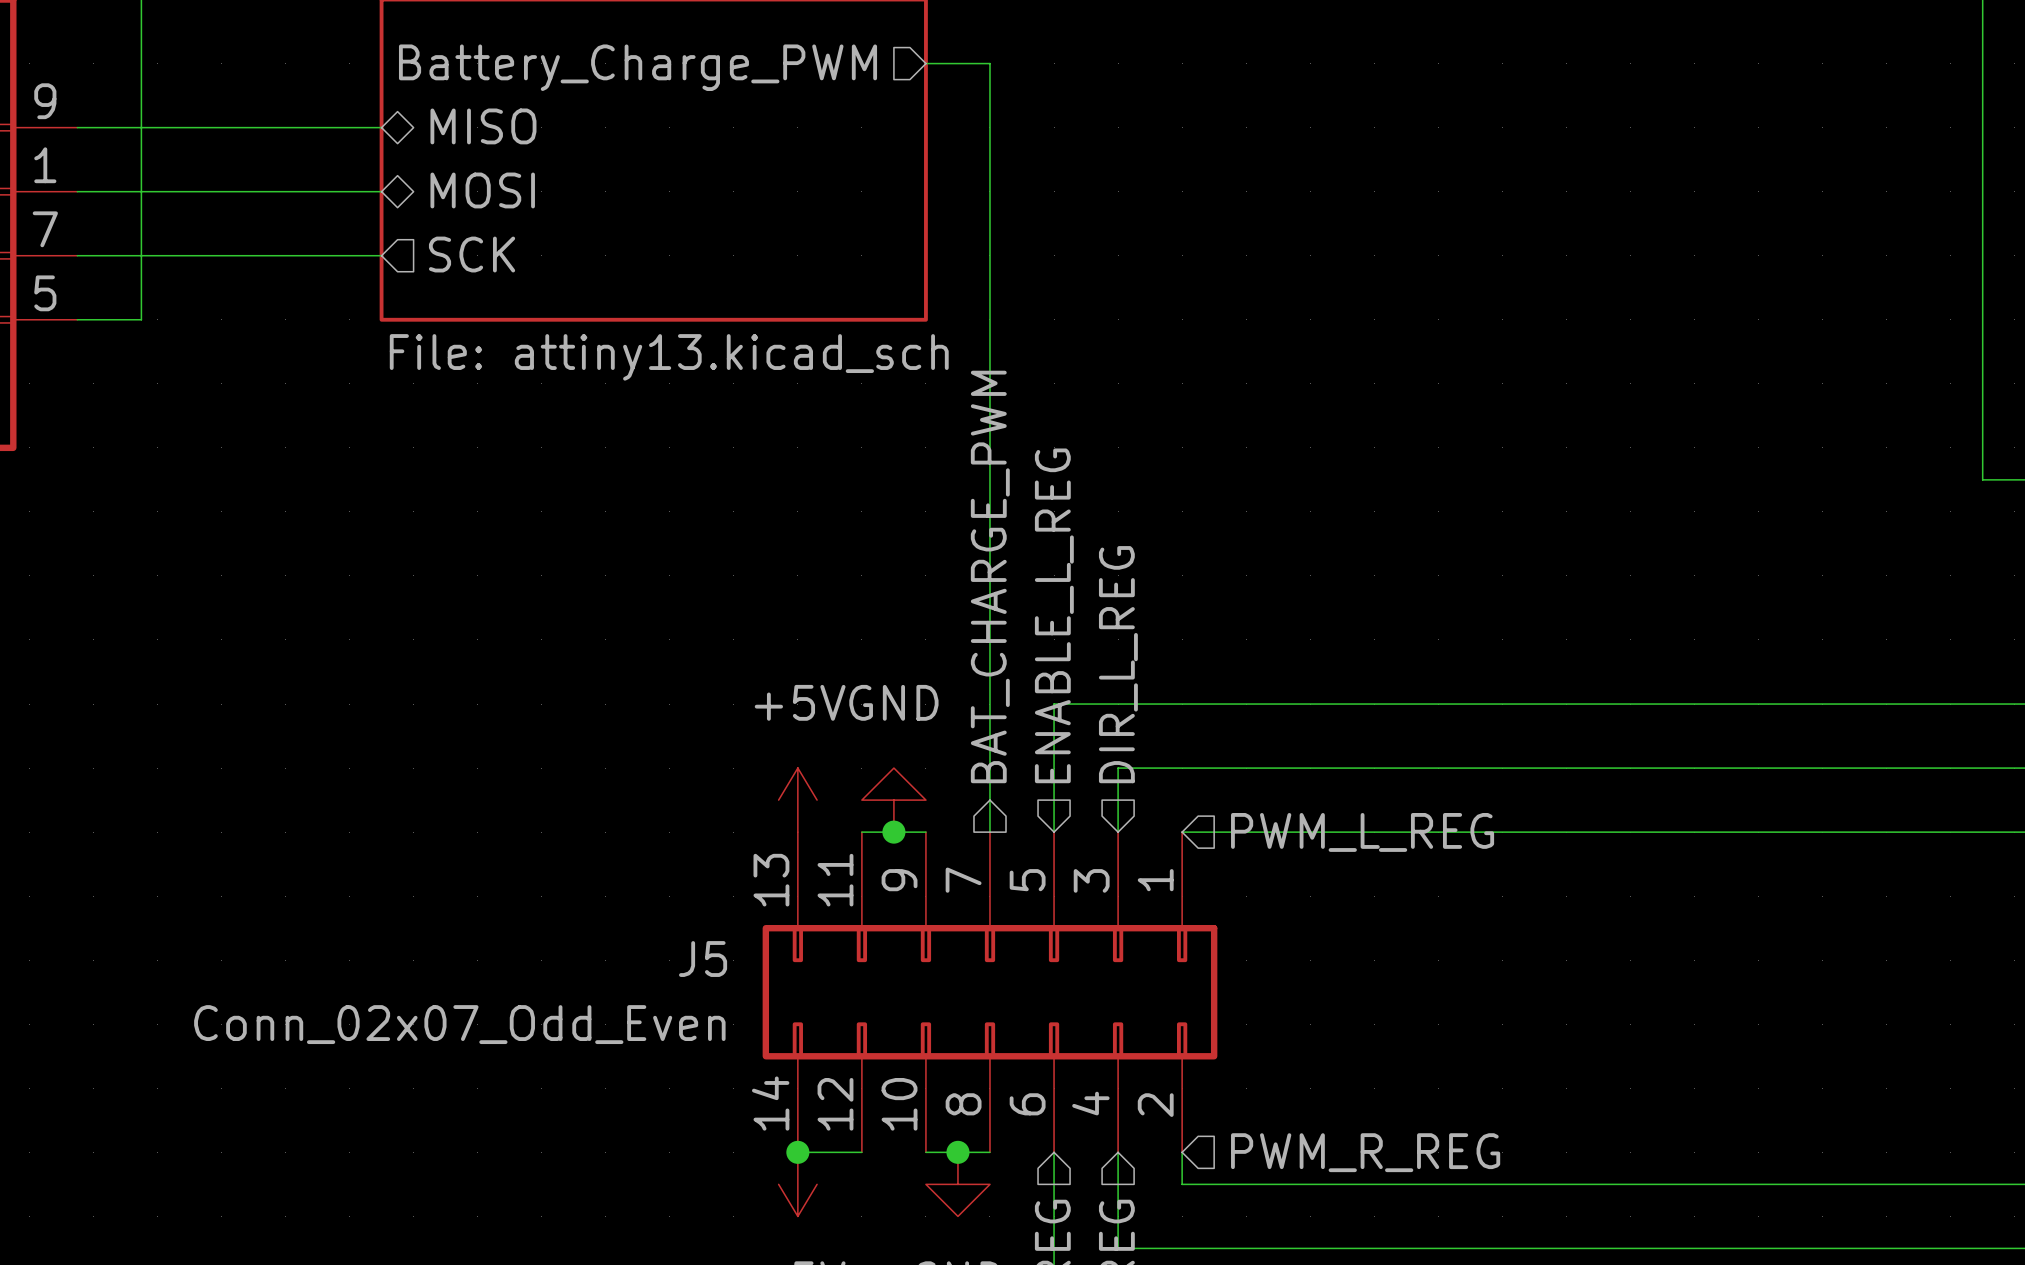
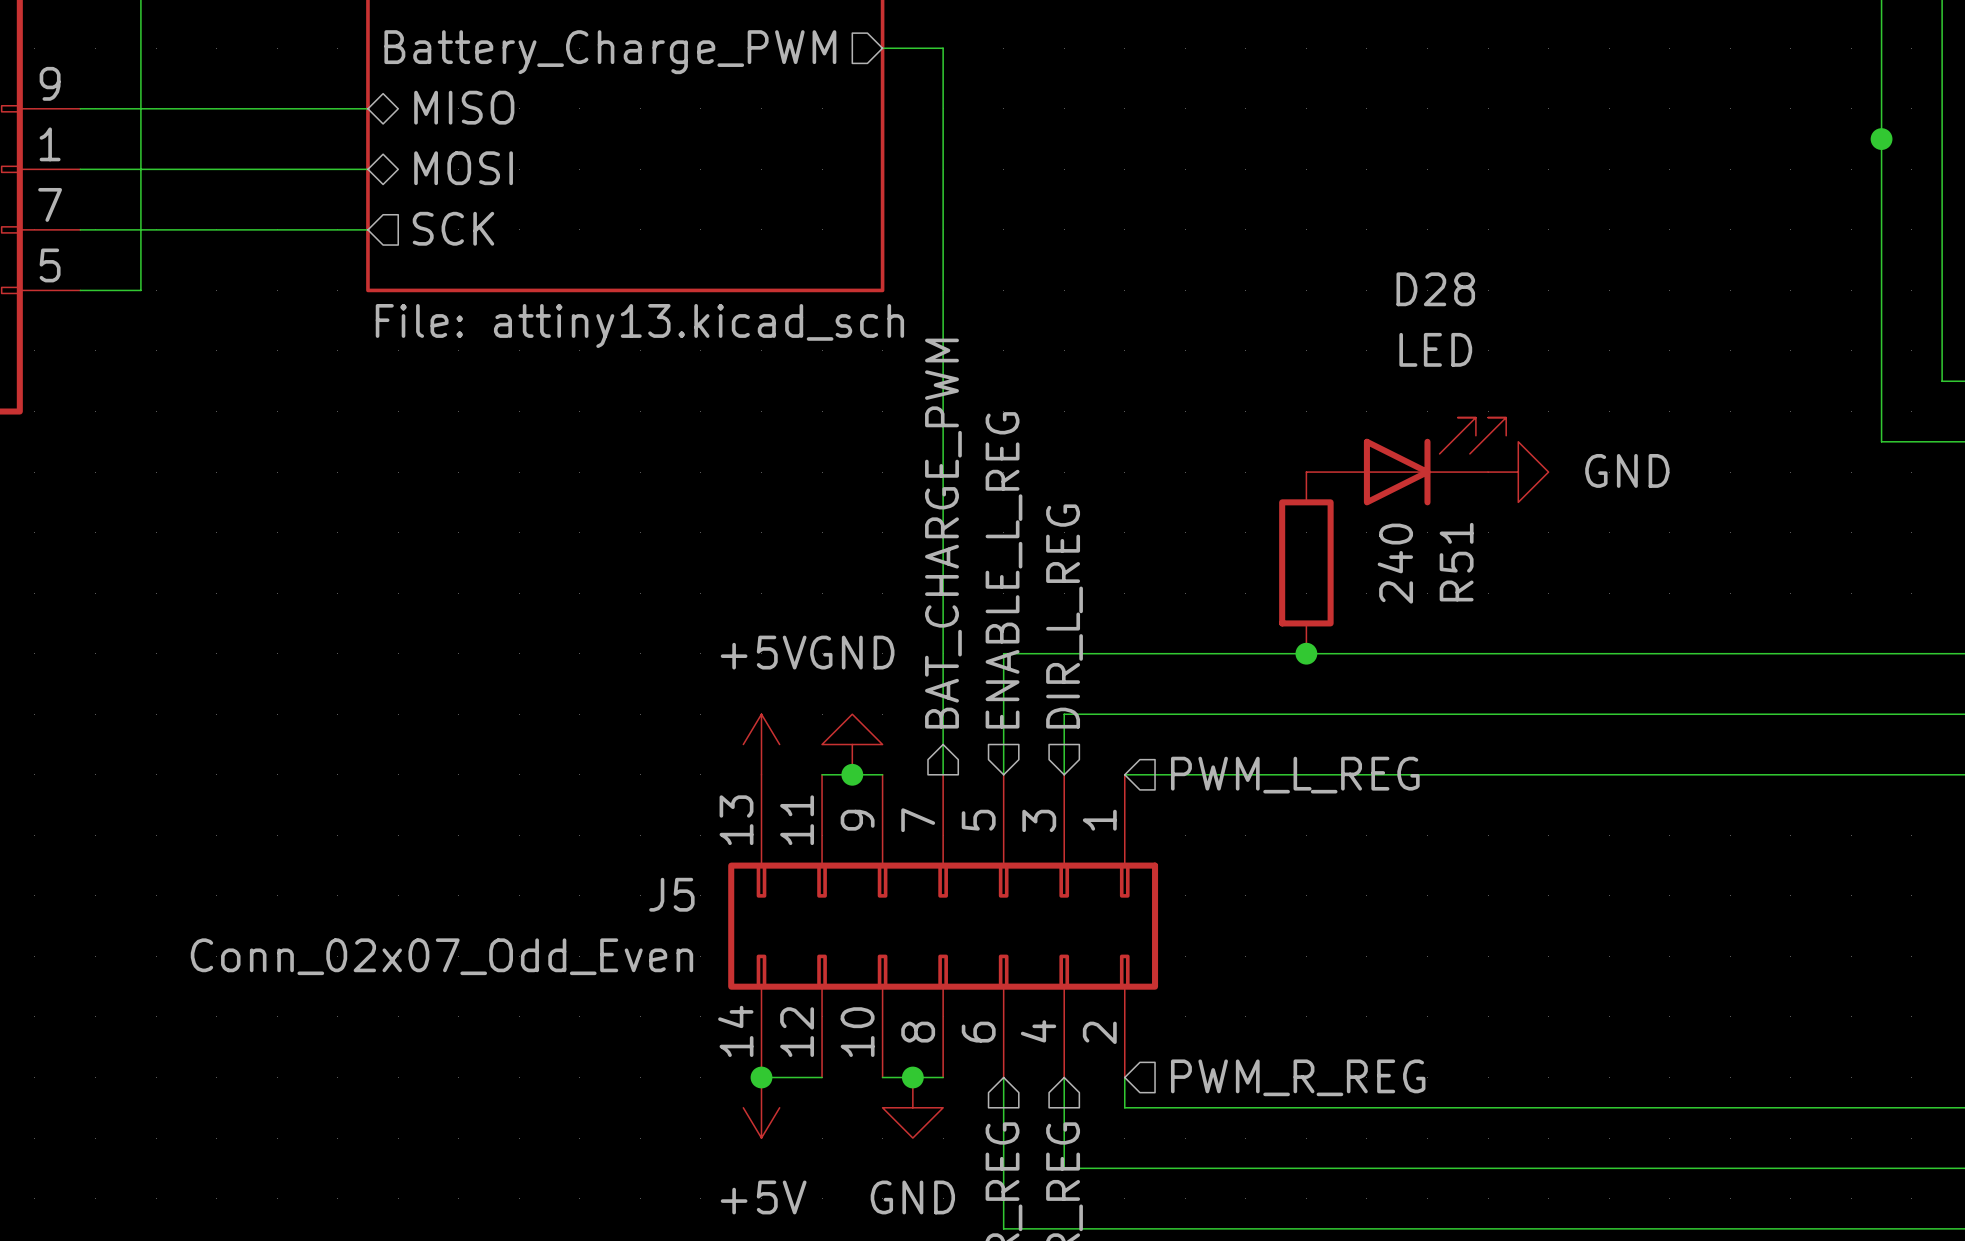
junction: none -> (1881, 139)
D28: none -> LED (1406, 461)
power symbol: none -> GND (1518, 472)
R51: none -> 240 (1306, 562)
junction: none -> (1306, 653)

